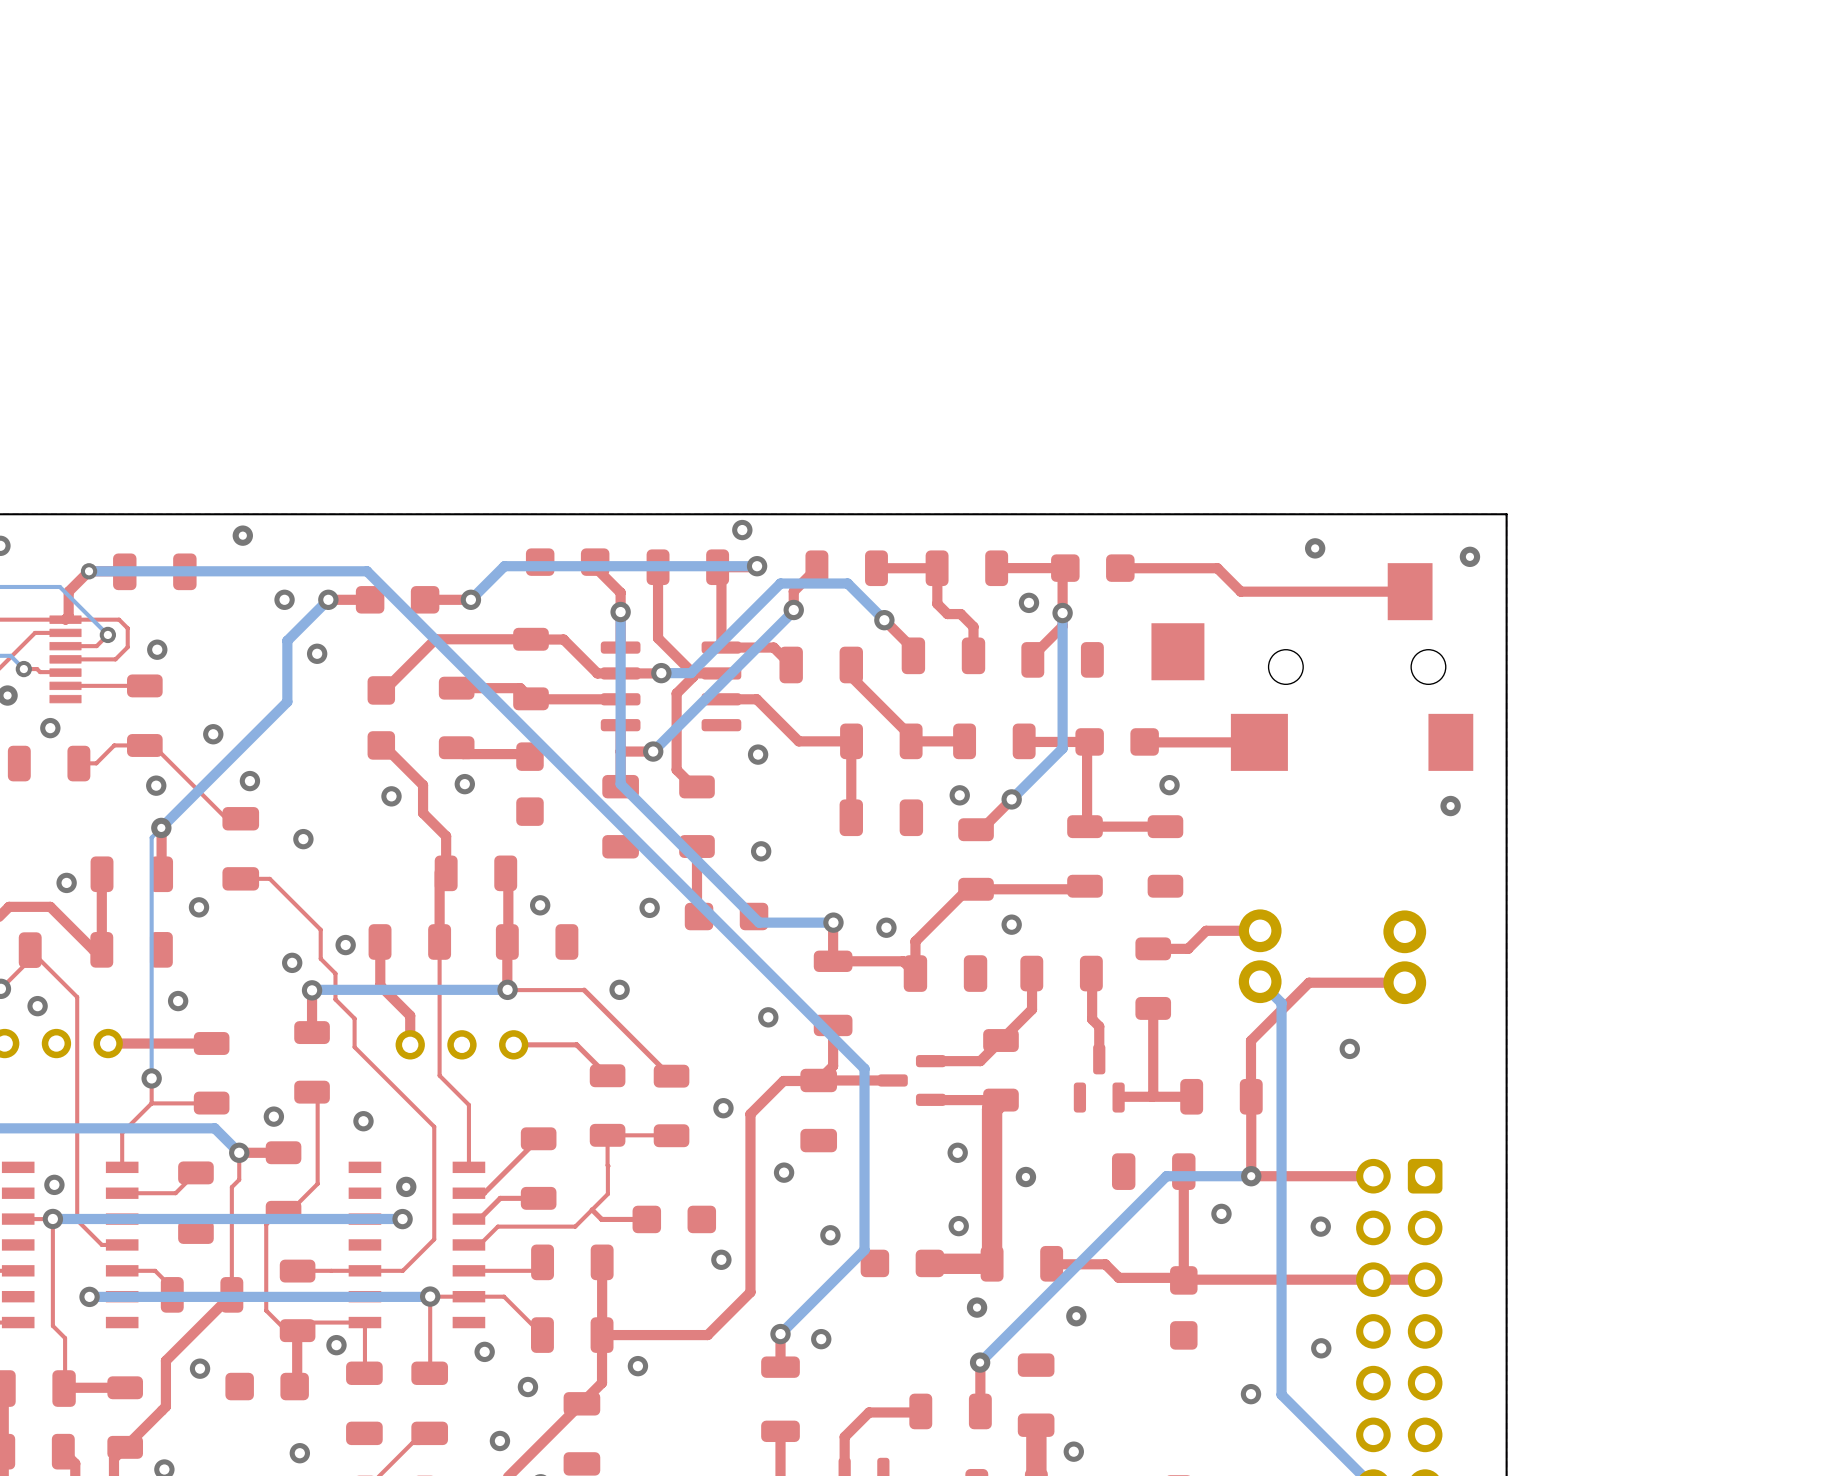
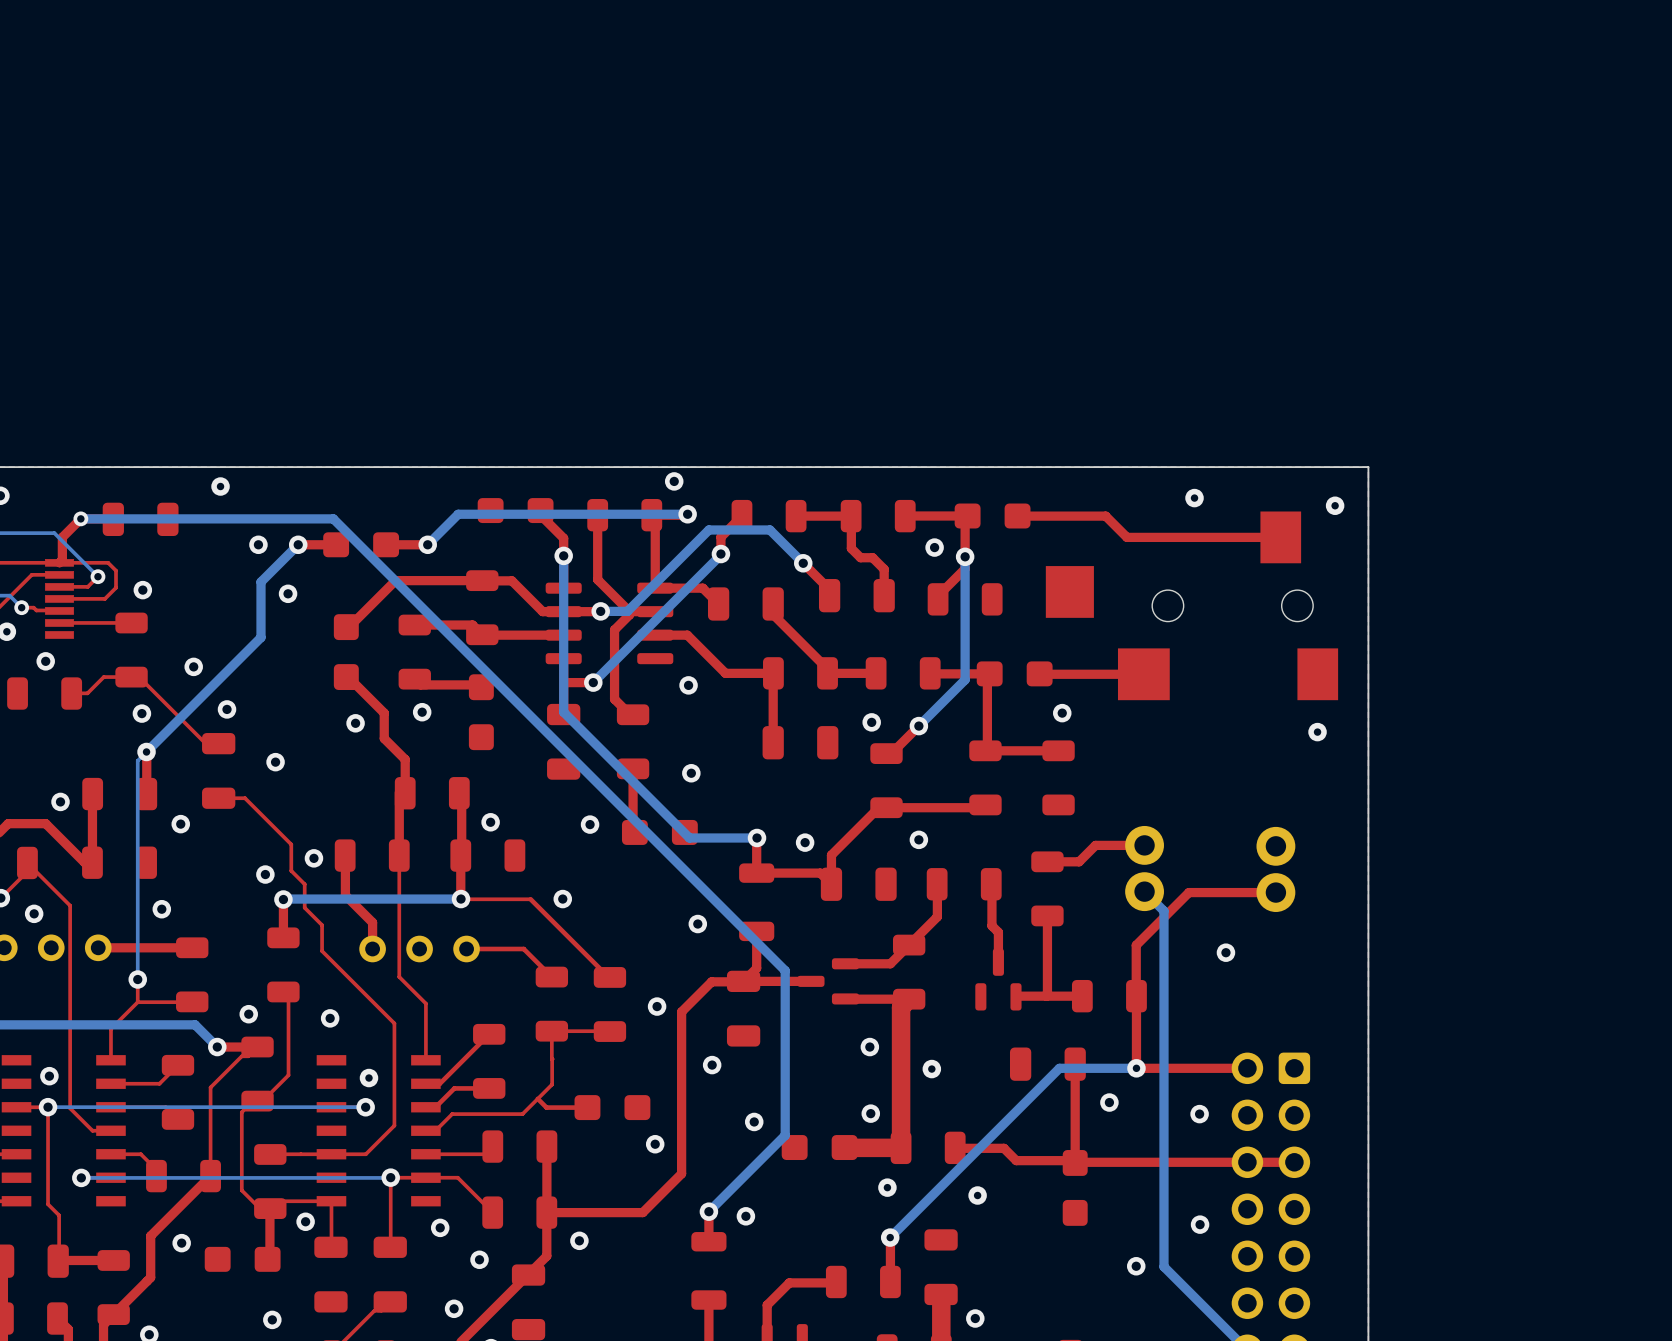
top track: (239, 1152) (239, 1179) (231, 1187) (231, 1197) -> (257, 1046) (248, 1056) (241, 1056) (210, 1087)
bottom track width: thick (402, 1218) (52, 1218) -> thin (365, 1107) (48, 1107)
bottom track width: thick (429, 1296) (89, 1296) -> thin (390, 1177) (81, 1177)

